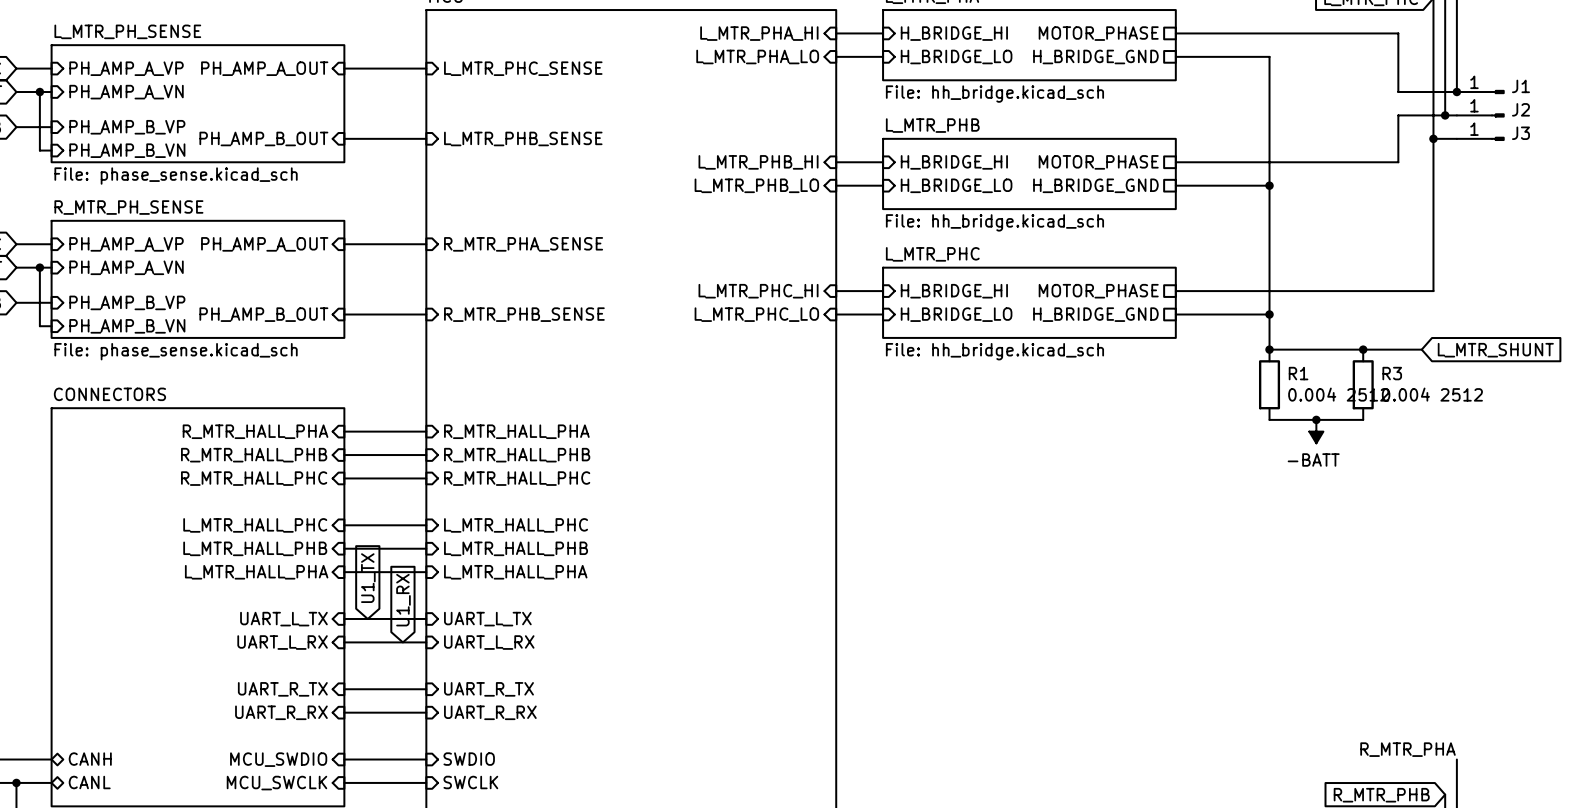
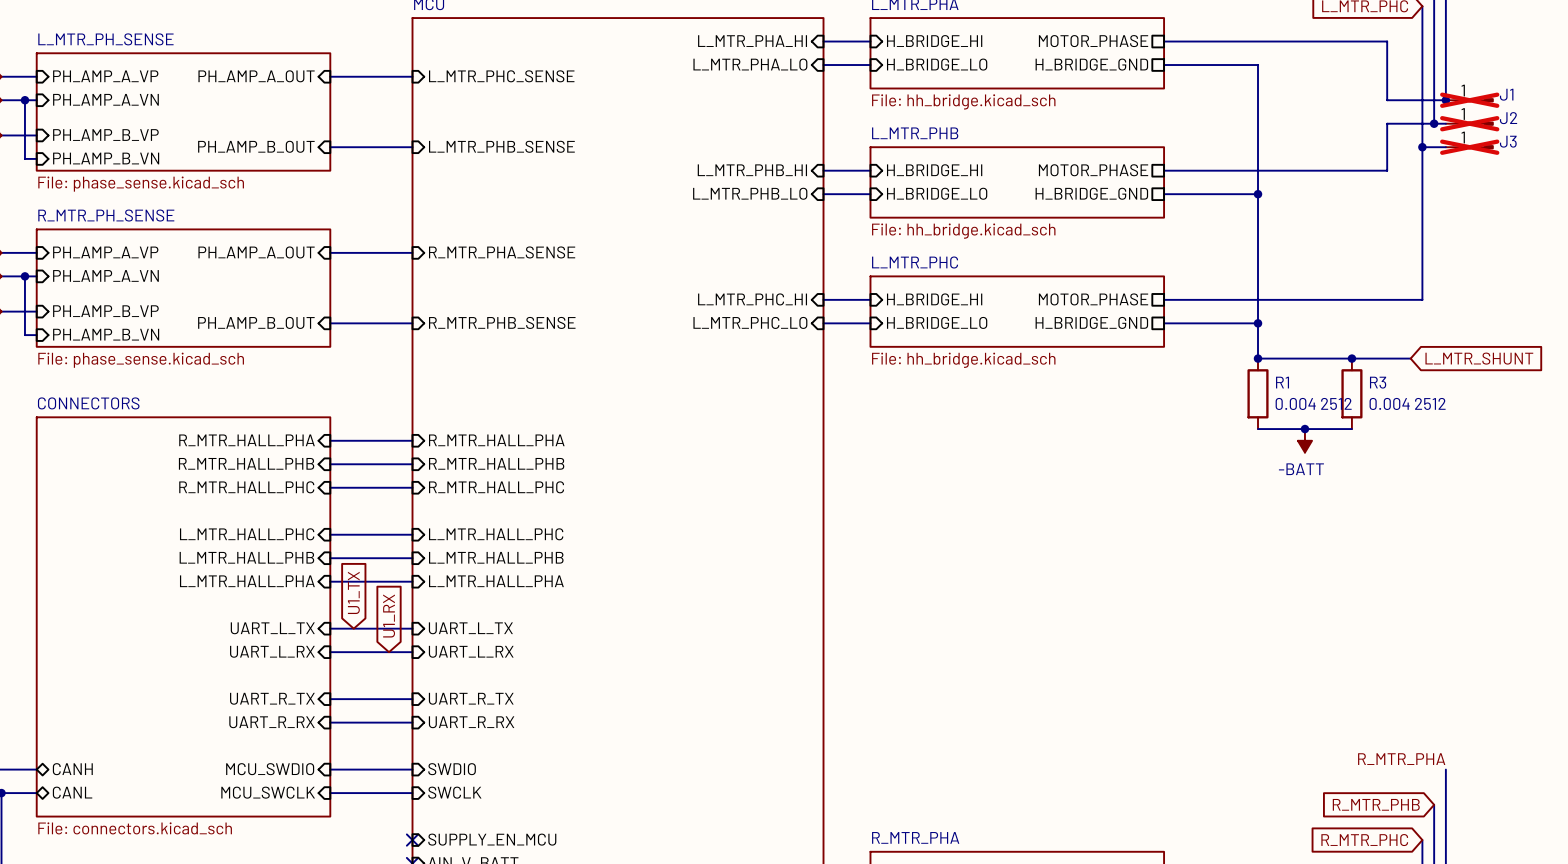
J1 do-not-place cross: none -> (1469, 100)
J2 do-not-place cross: none -> (1469, 123)
J3 do-not-place cross: none -> (1469, 147)

